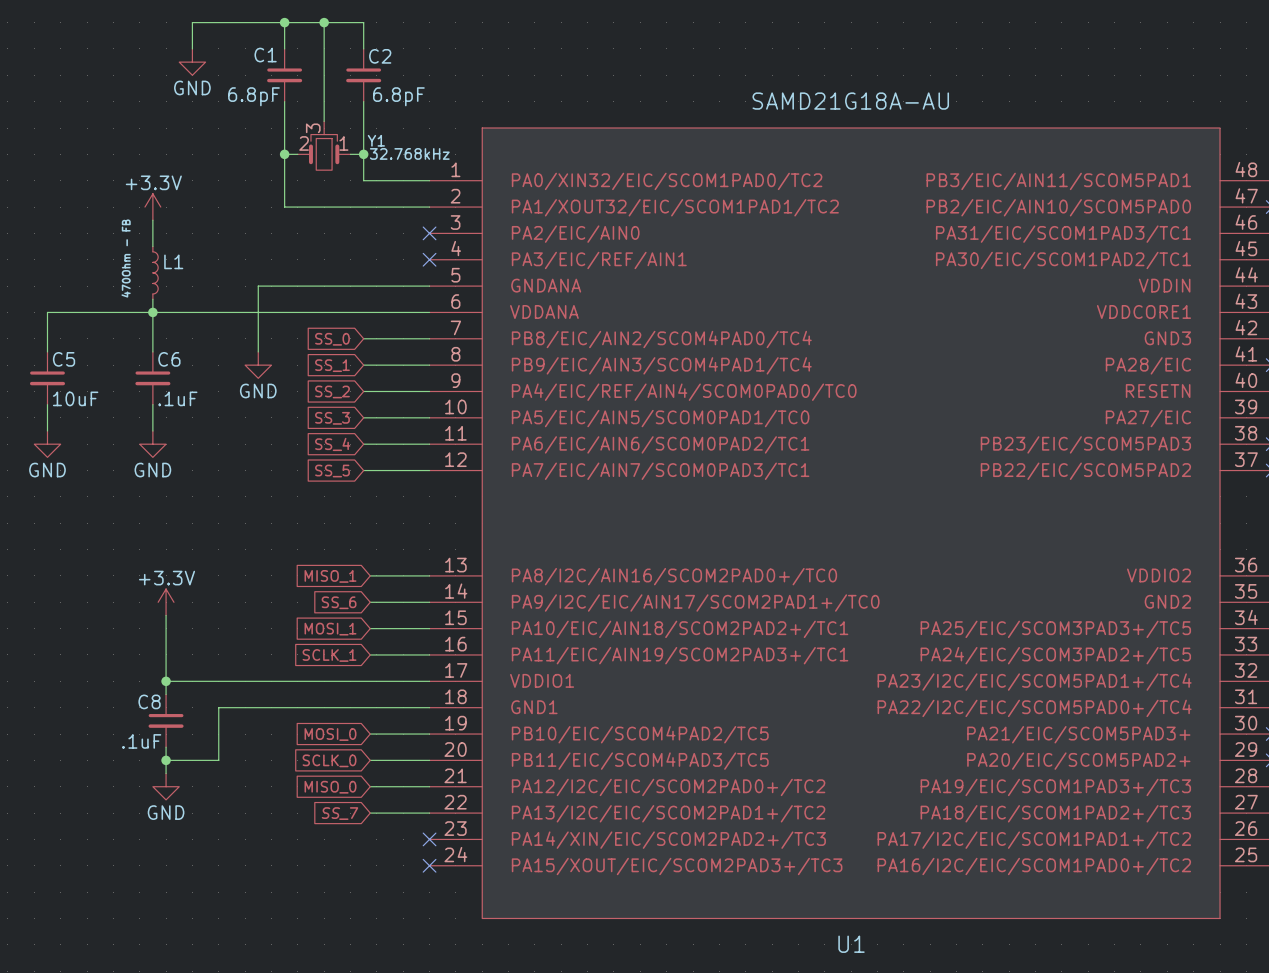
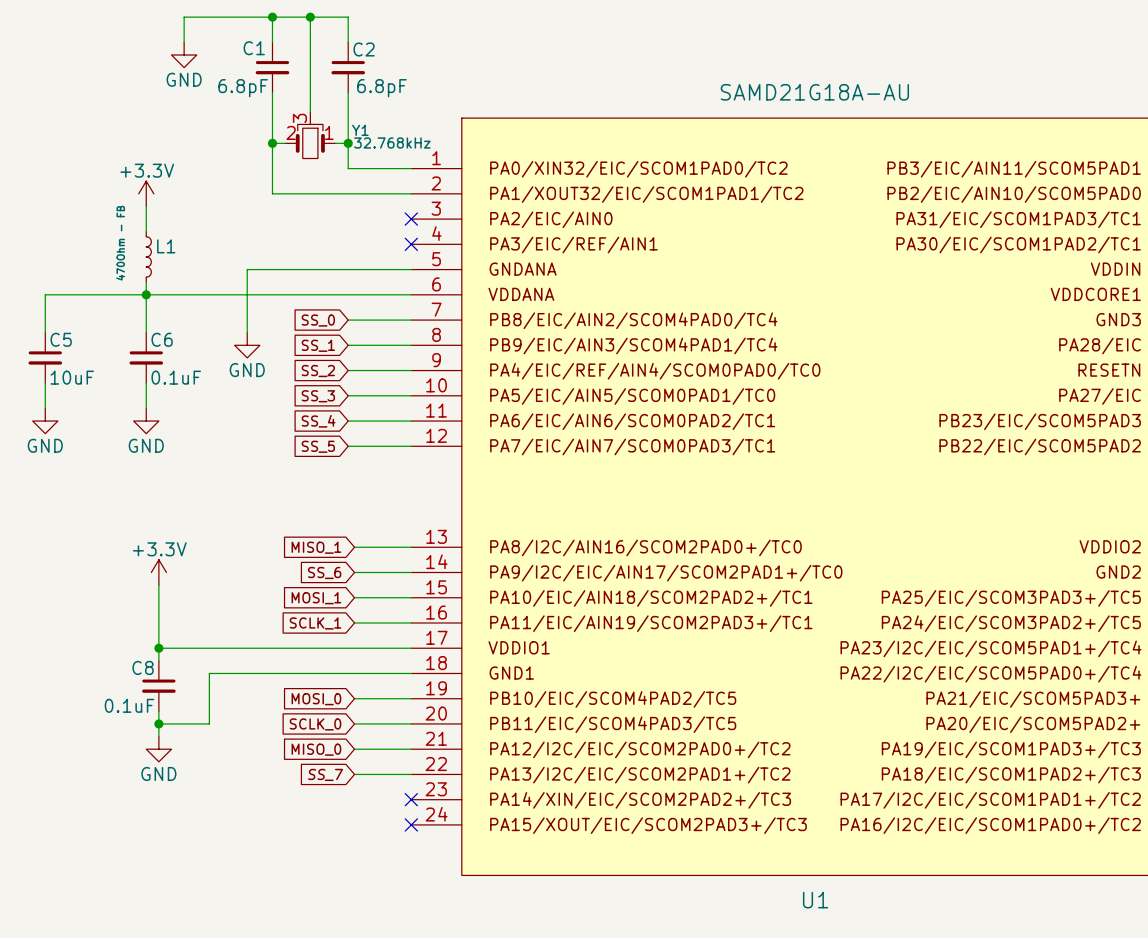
C6 value: .1uF (177, 398) -> 0.1uF (176, 377)
C8 value: .1uF (141, 741) -> 0.1uF (129, 705)

